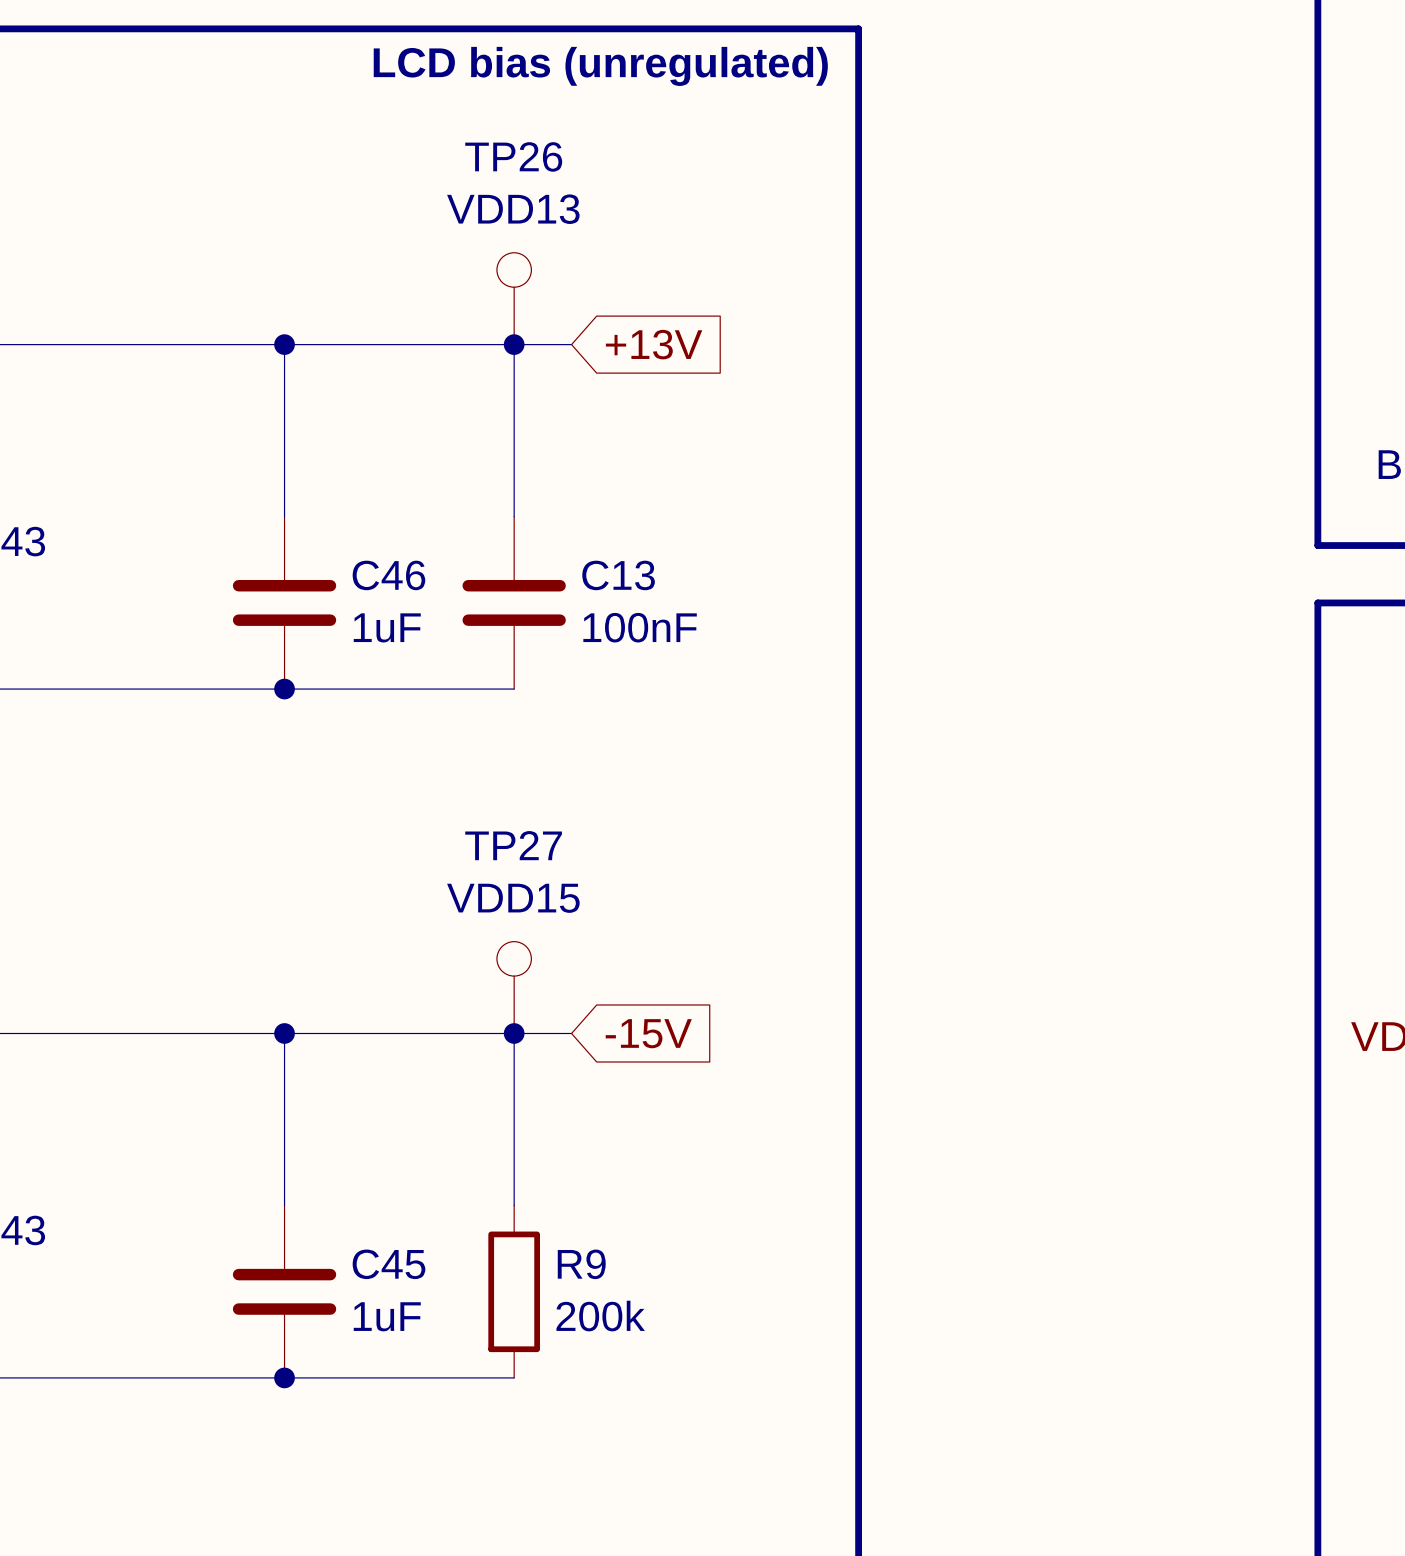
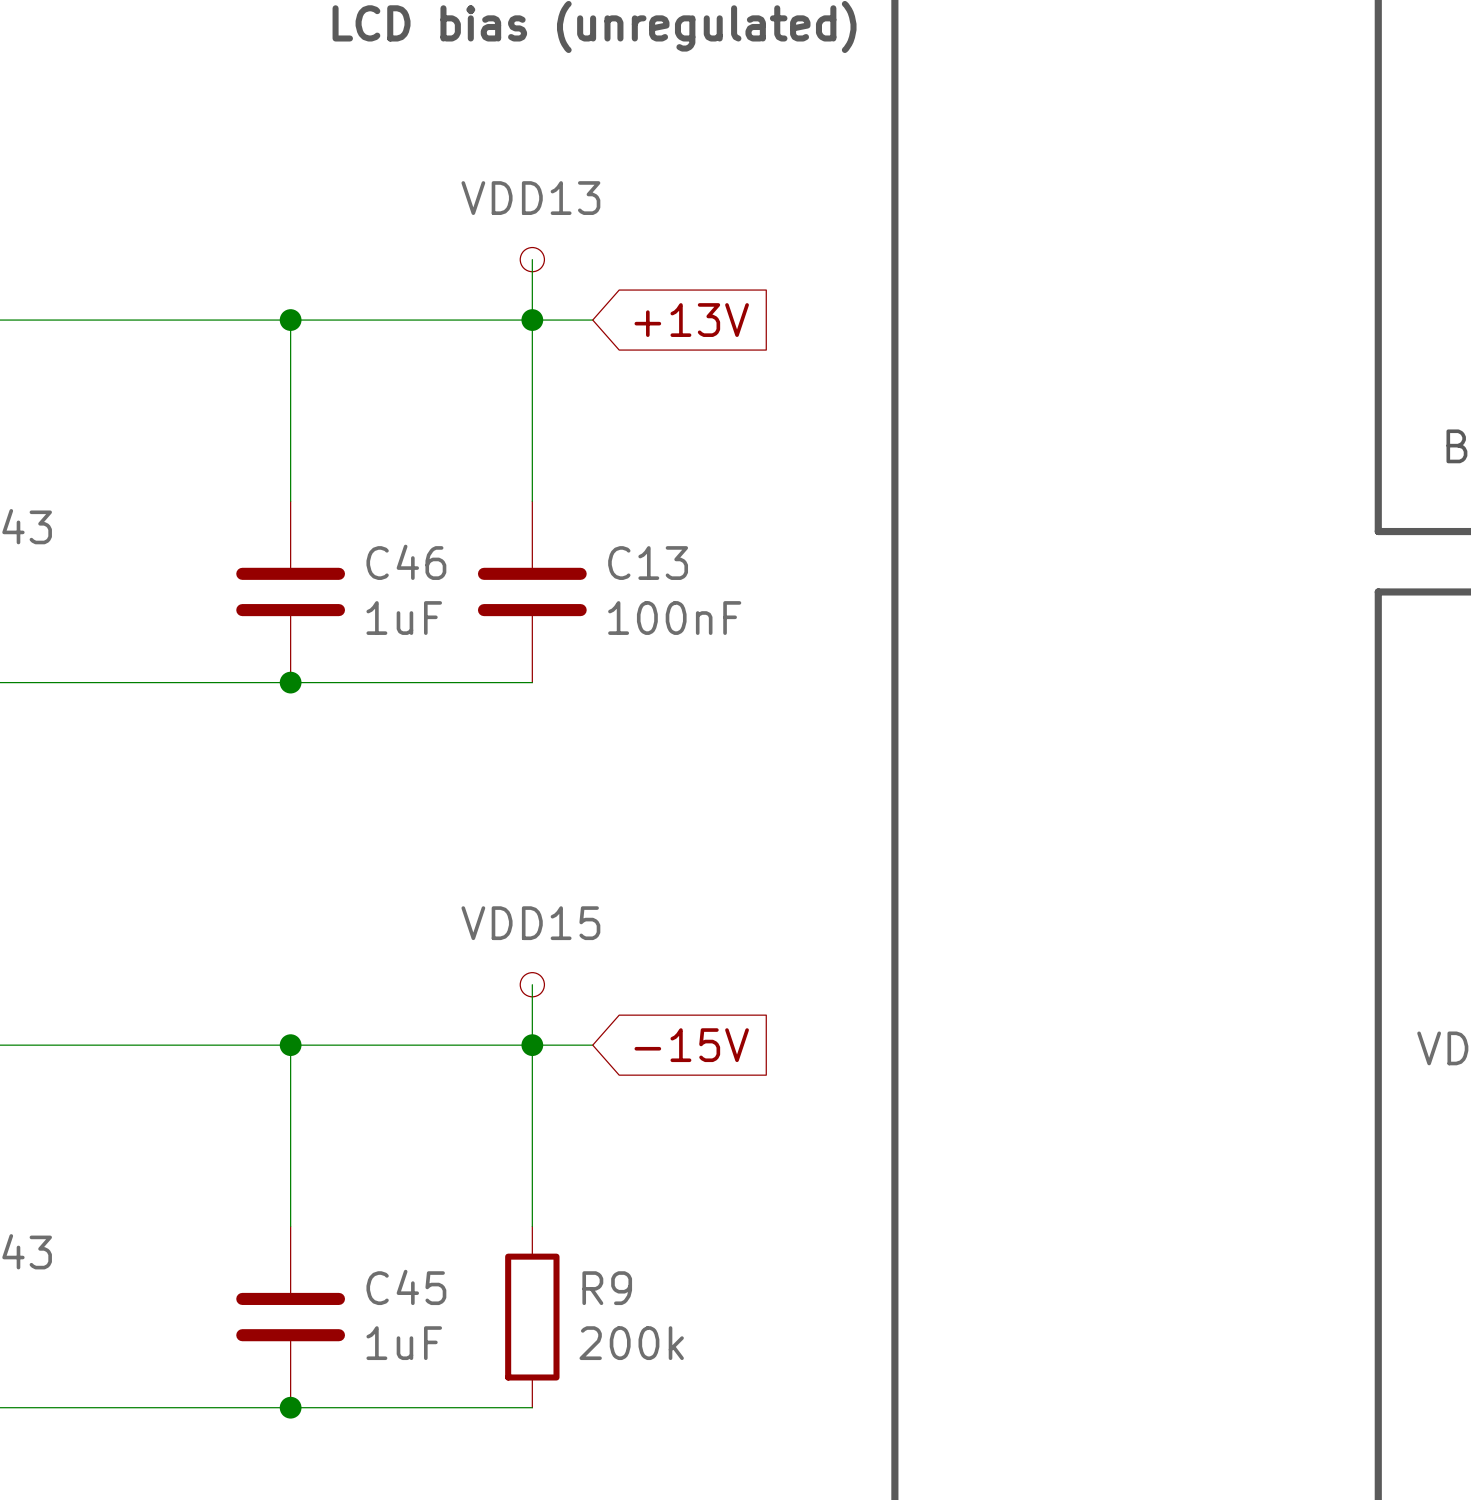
part: none -> VDD13 (532, 259)
TP26: VDD13 (514, 298) -> none
part: none -> VDD15 (532, 984)
TP27: VDD15 (514, 987) -> none

